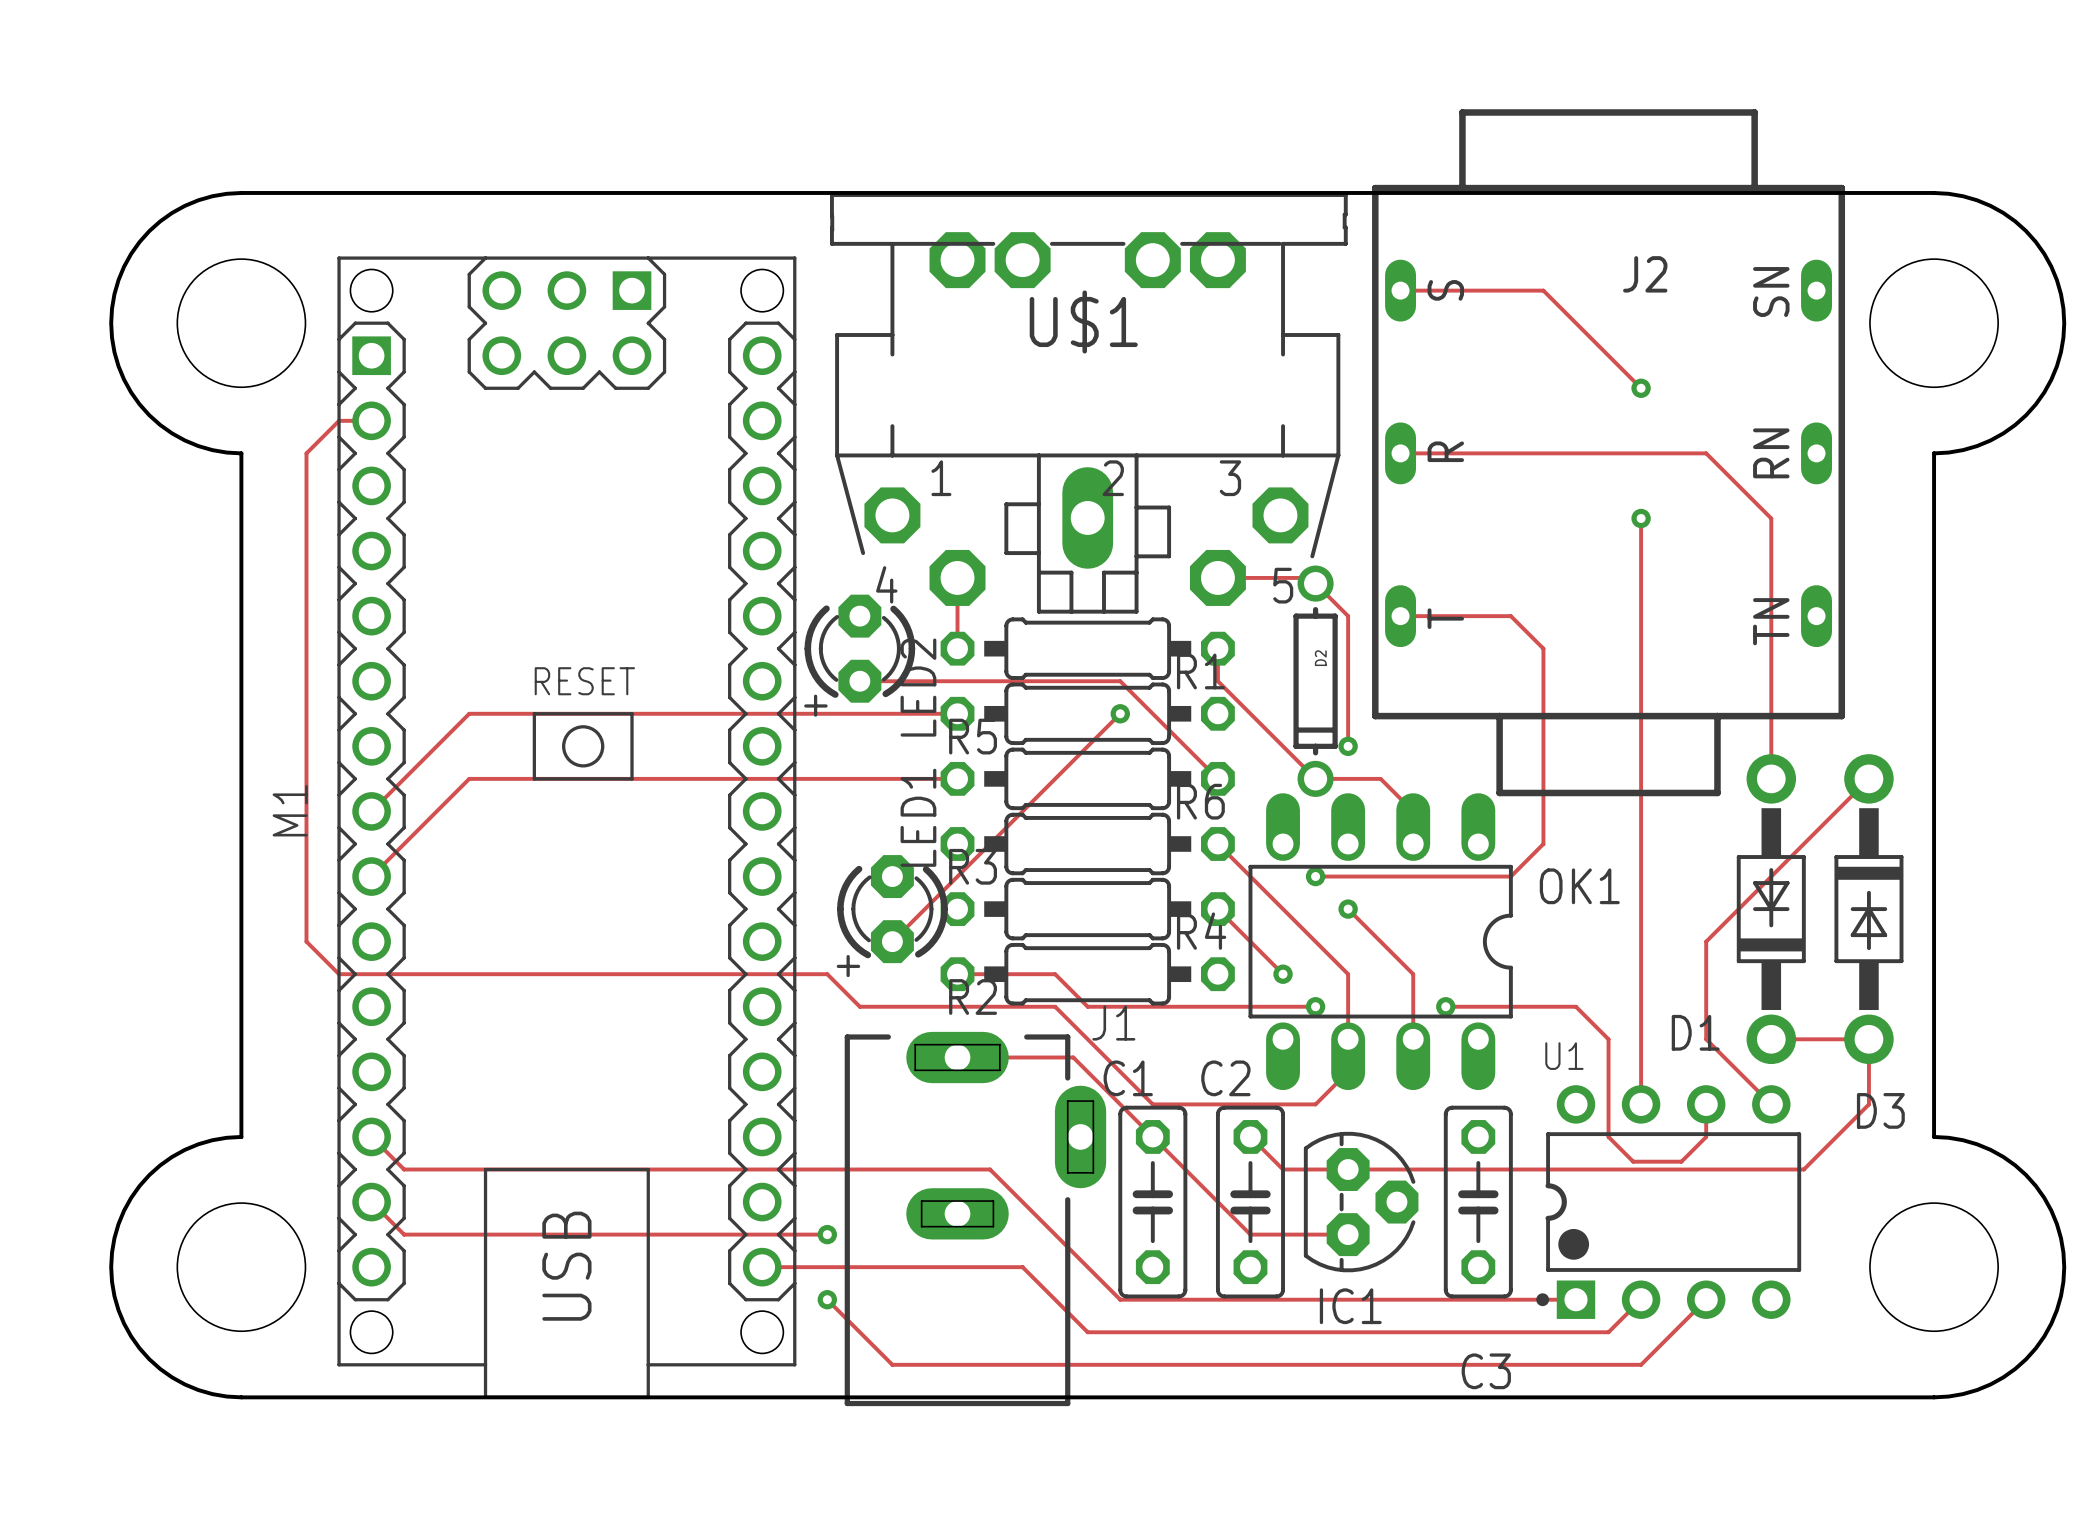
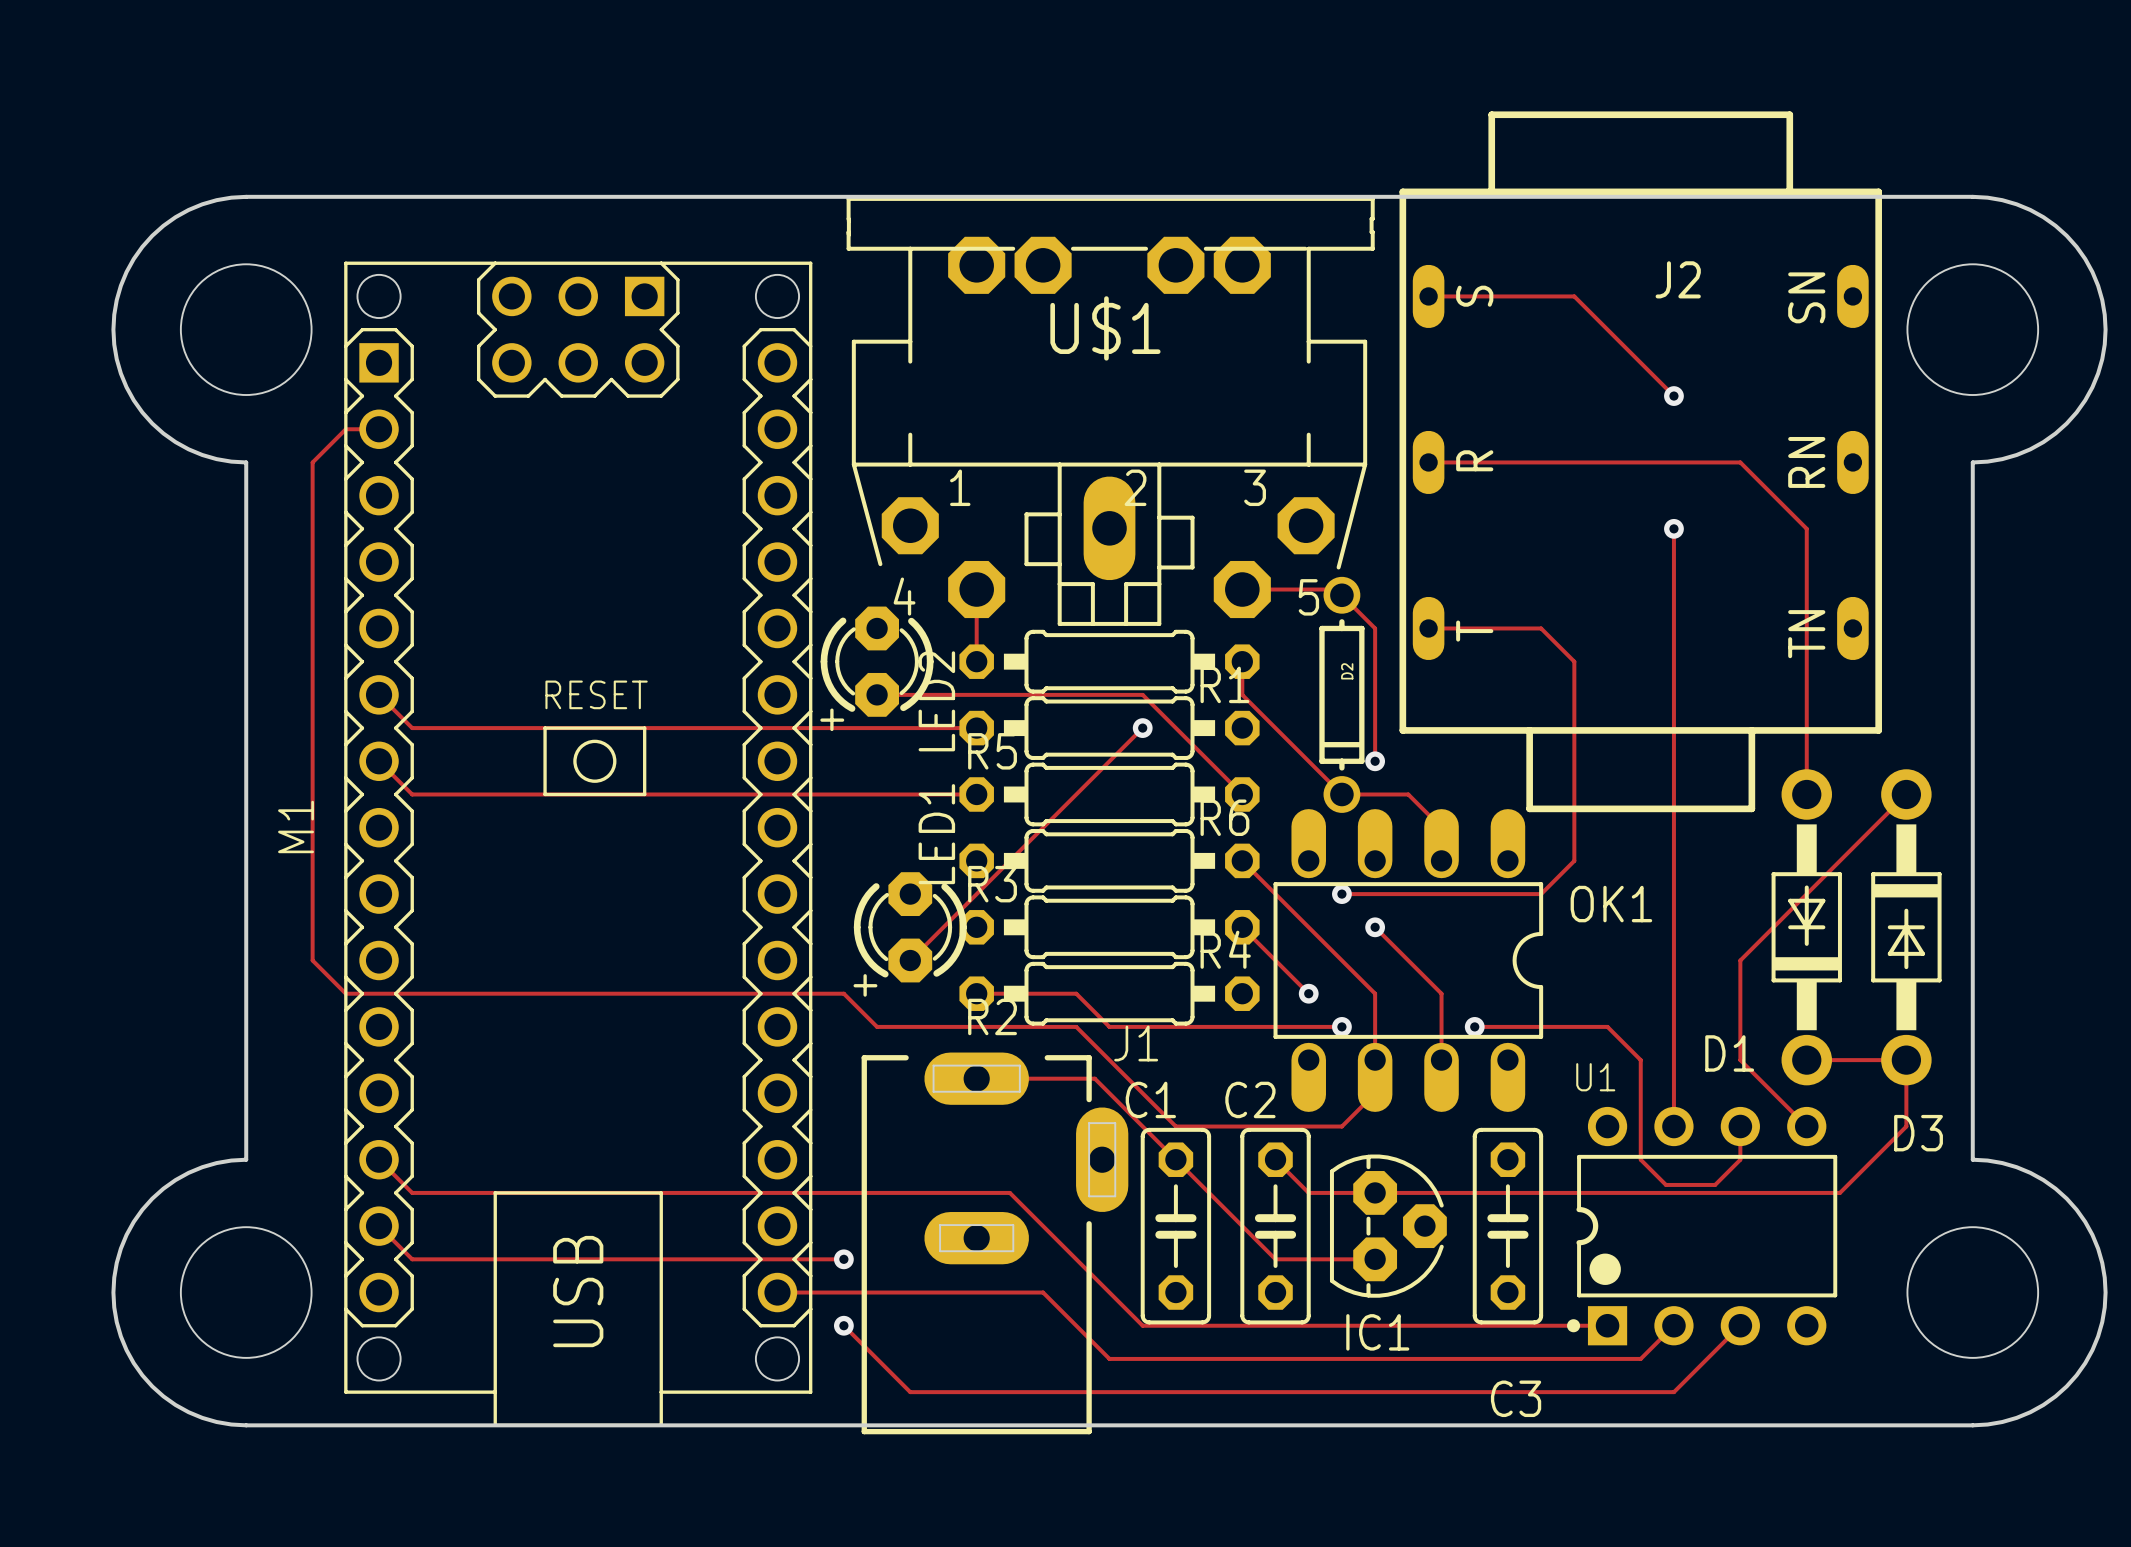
track: (469, 713) (371, 811) -> (478, 728) (412, 728) (379, 694)
track: (469, 778) (371, 876) -> (478, 794) (412, 794) (379, 761)

